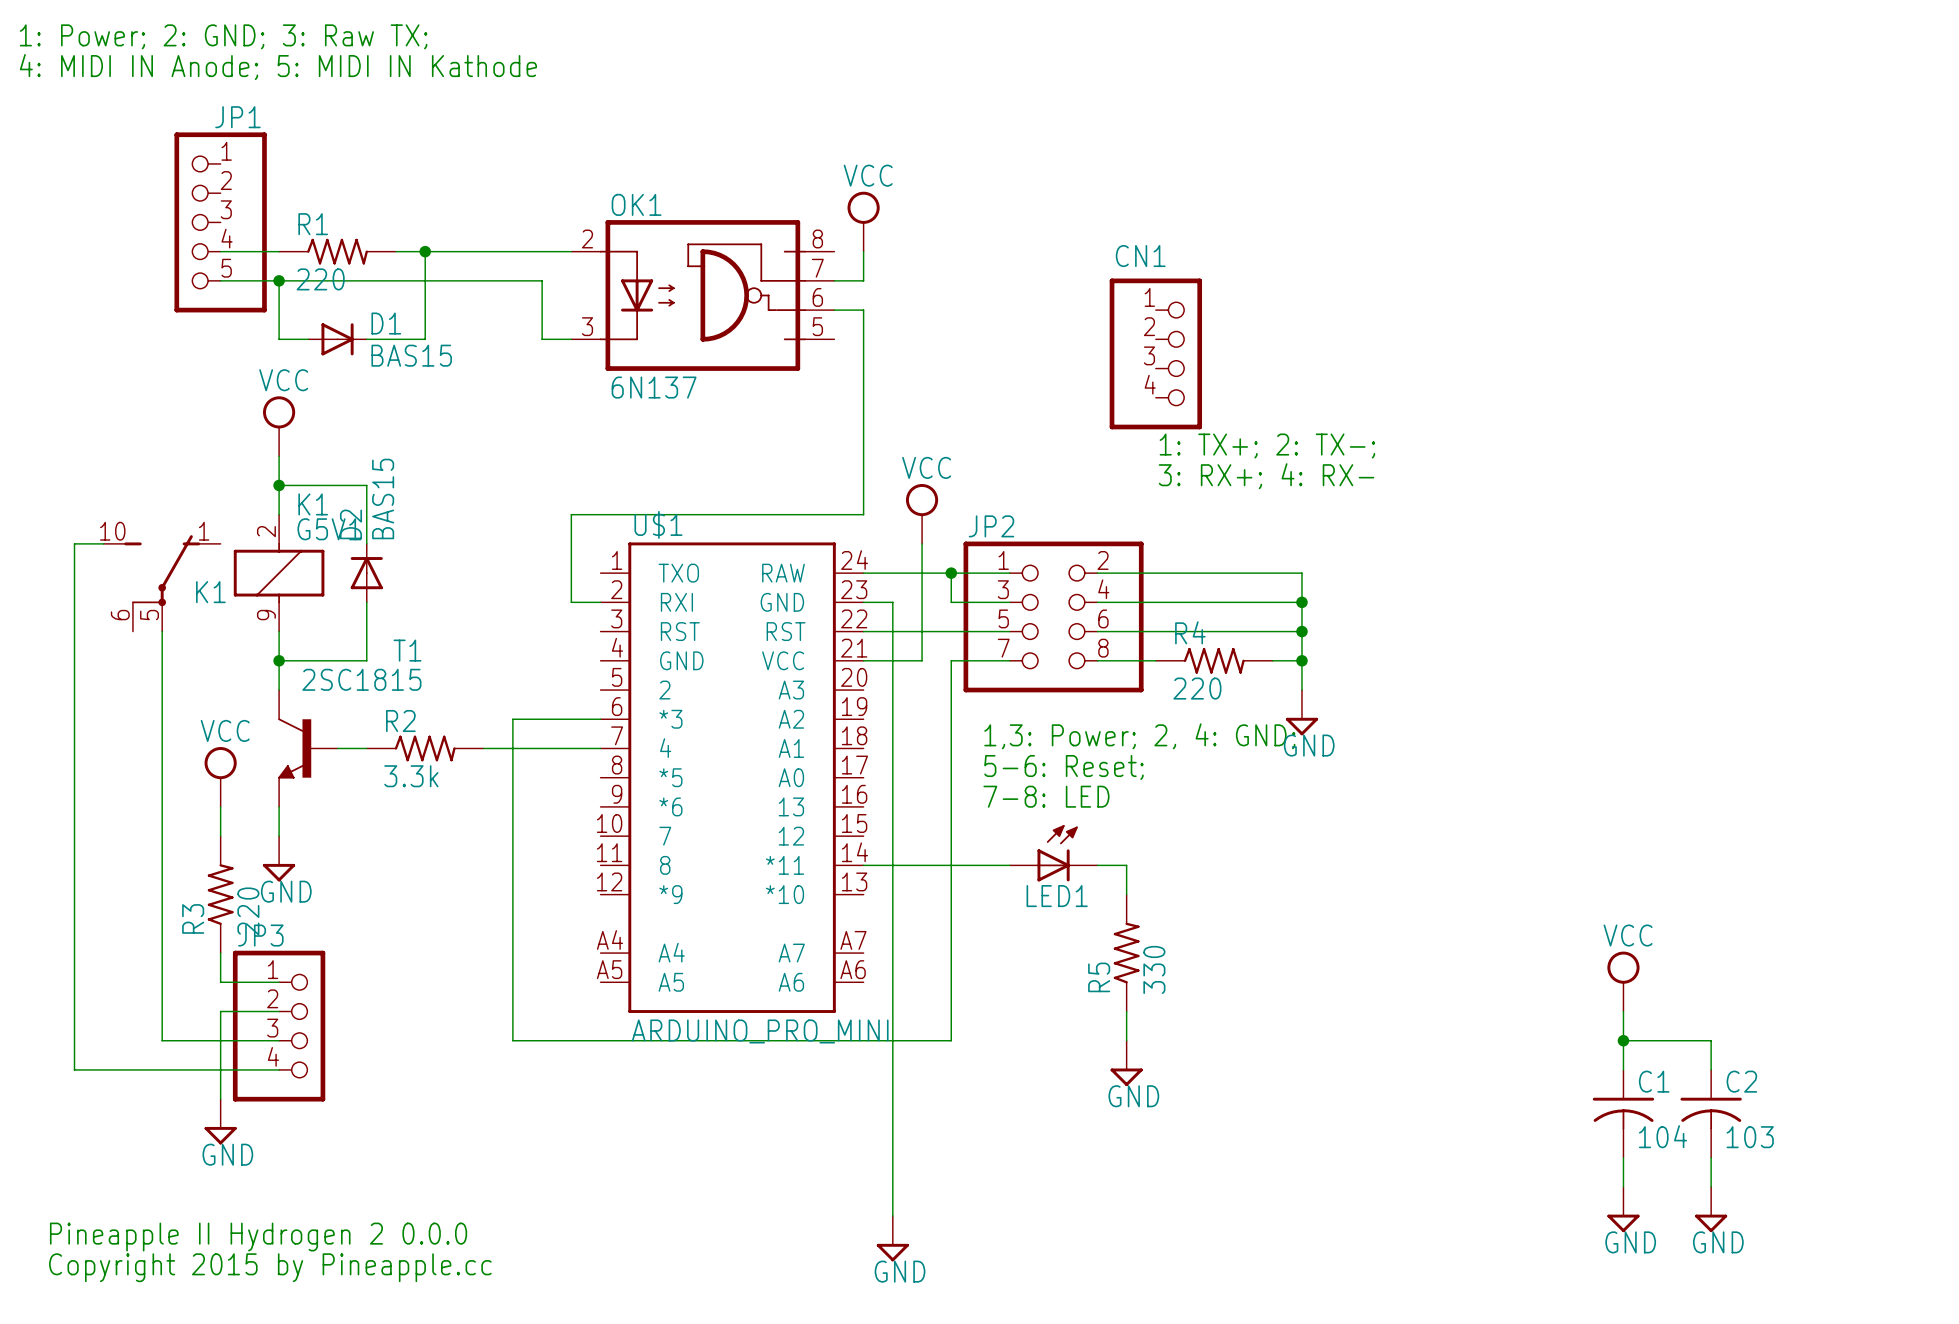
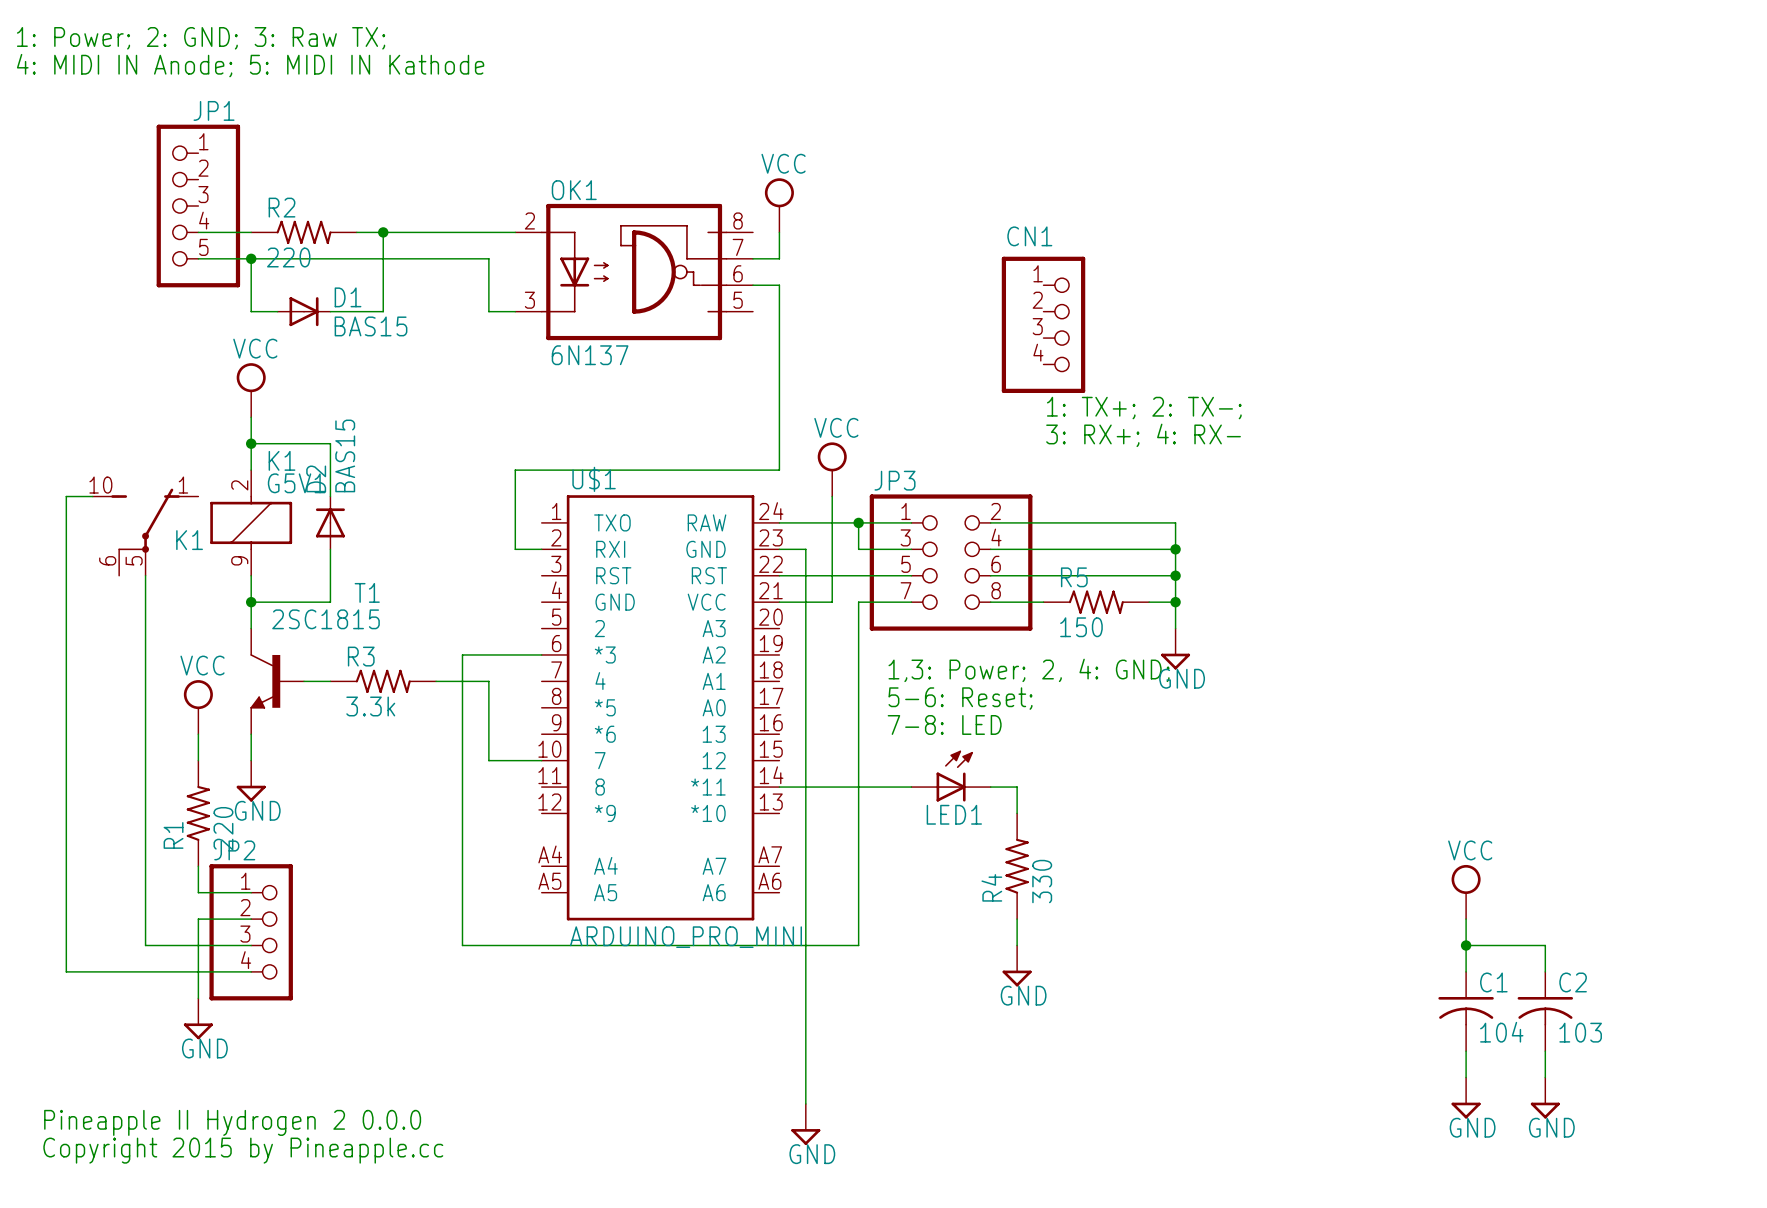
R1 name: R1 (313, 224) -> R2 (282, 207)
JP2 name: JP2 (991, 526) -> JP3 (895, 480)
R4 name: R4 (1190, 632) -> R5 (1074, 577)
R4 value: 220 (1197, 688) -> 150 (1081, 627)
R2 name: R2 (400, 721) -> R3 (361, 656)
wire: (542, 748) (600, 748) -> (488, 681) (488, 760) (541, 760)
R3 name: R3 (193, 918) -> R1 (173, 835)
JP3 name: JP3 (260, 935) -> JP2 (234, 850)
R5 name: R5 (1099, 977) -> R4 (991, 887)

